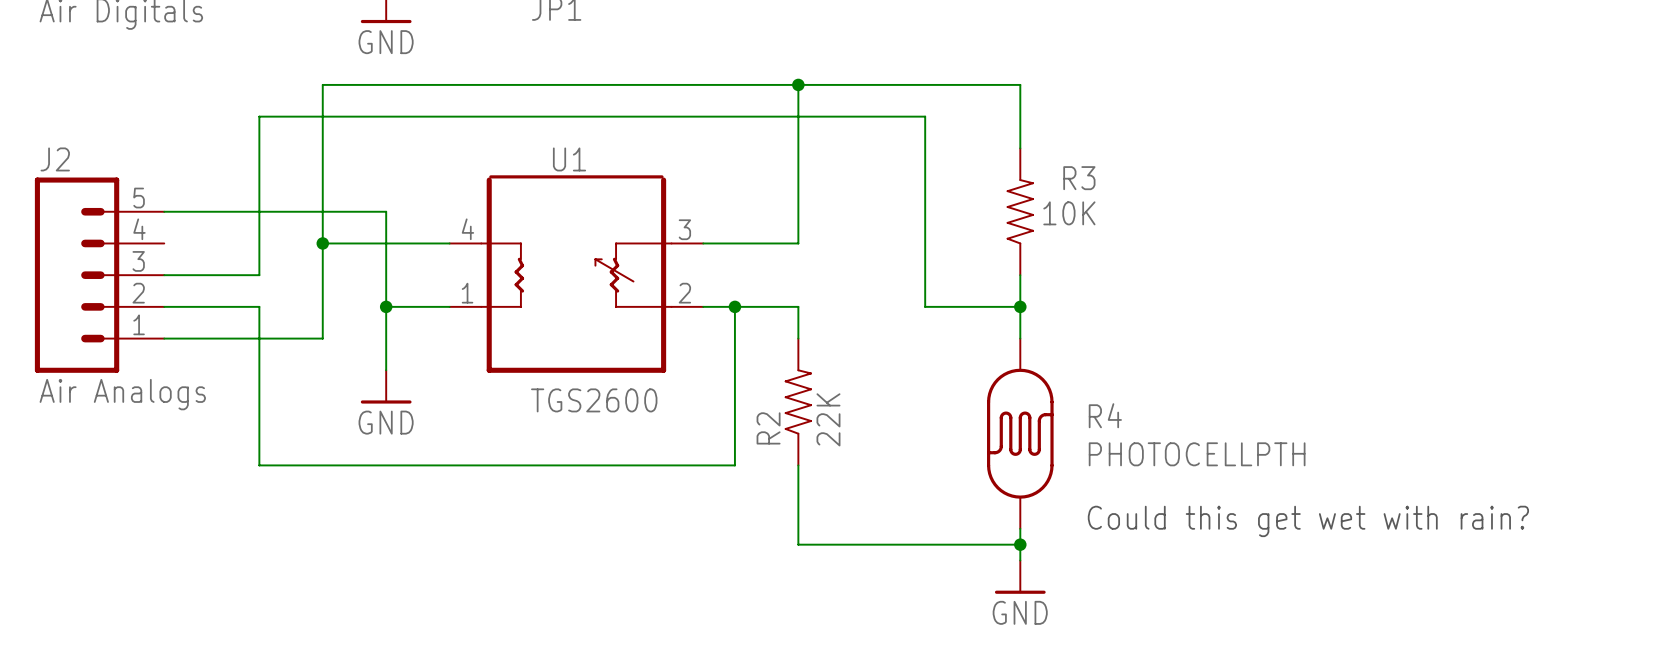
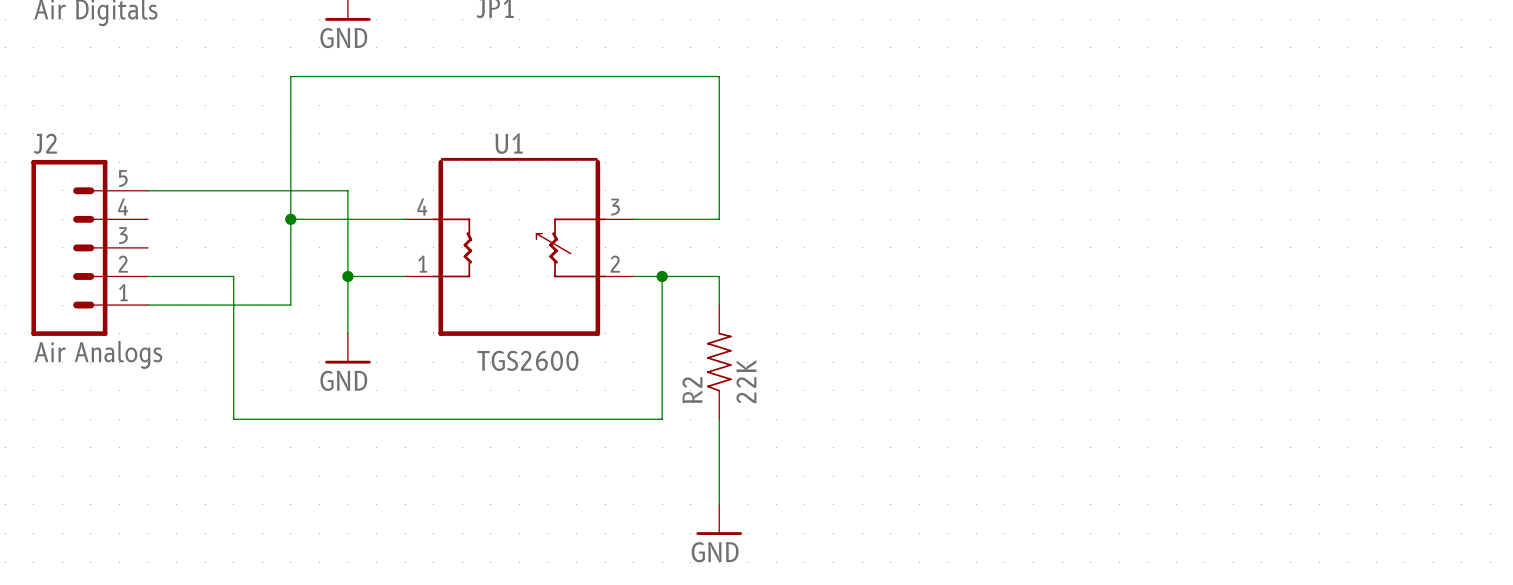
wire: (798, 84) (1020, 84) (1020, 148) -> none
junction: (798, 84) -> none
R3: 10K (1020, 211) -> none
wire: (164, 275) (259, 275) (259, 116) (925, 116) (925, 306) (1020, 306) -> none
wire: (1020, 275) (1020, 338) -> none
junction: (1020, 306) -> none
R4: PHOTOCELLPTH (1020, 433) -> none
text: Could this get wet with rain? (1308, 521) -> none
wire: (1020, 528) (1020, 560) -> none
wire: (798, 544) (1020, 544) -> (719, 490) (719, 504)
junction: (1020, 544) -> none
power symbol position: GND (1020, 577) -> GND (719, 519)

